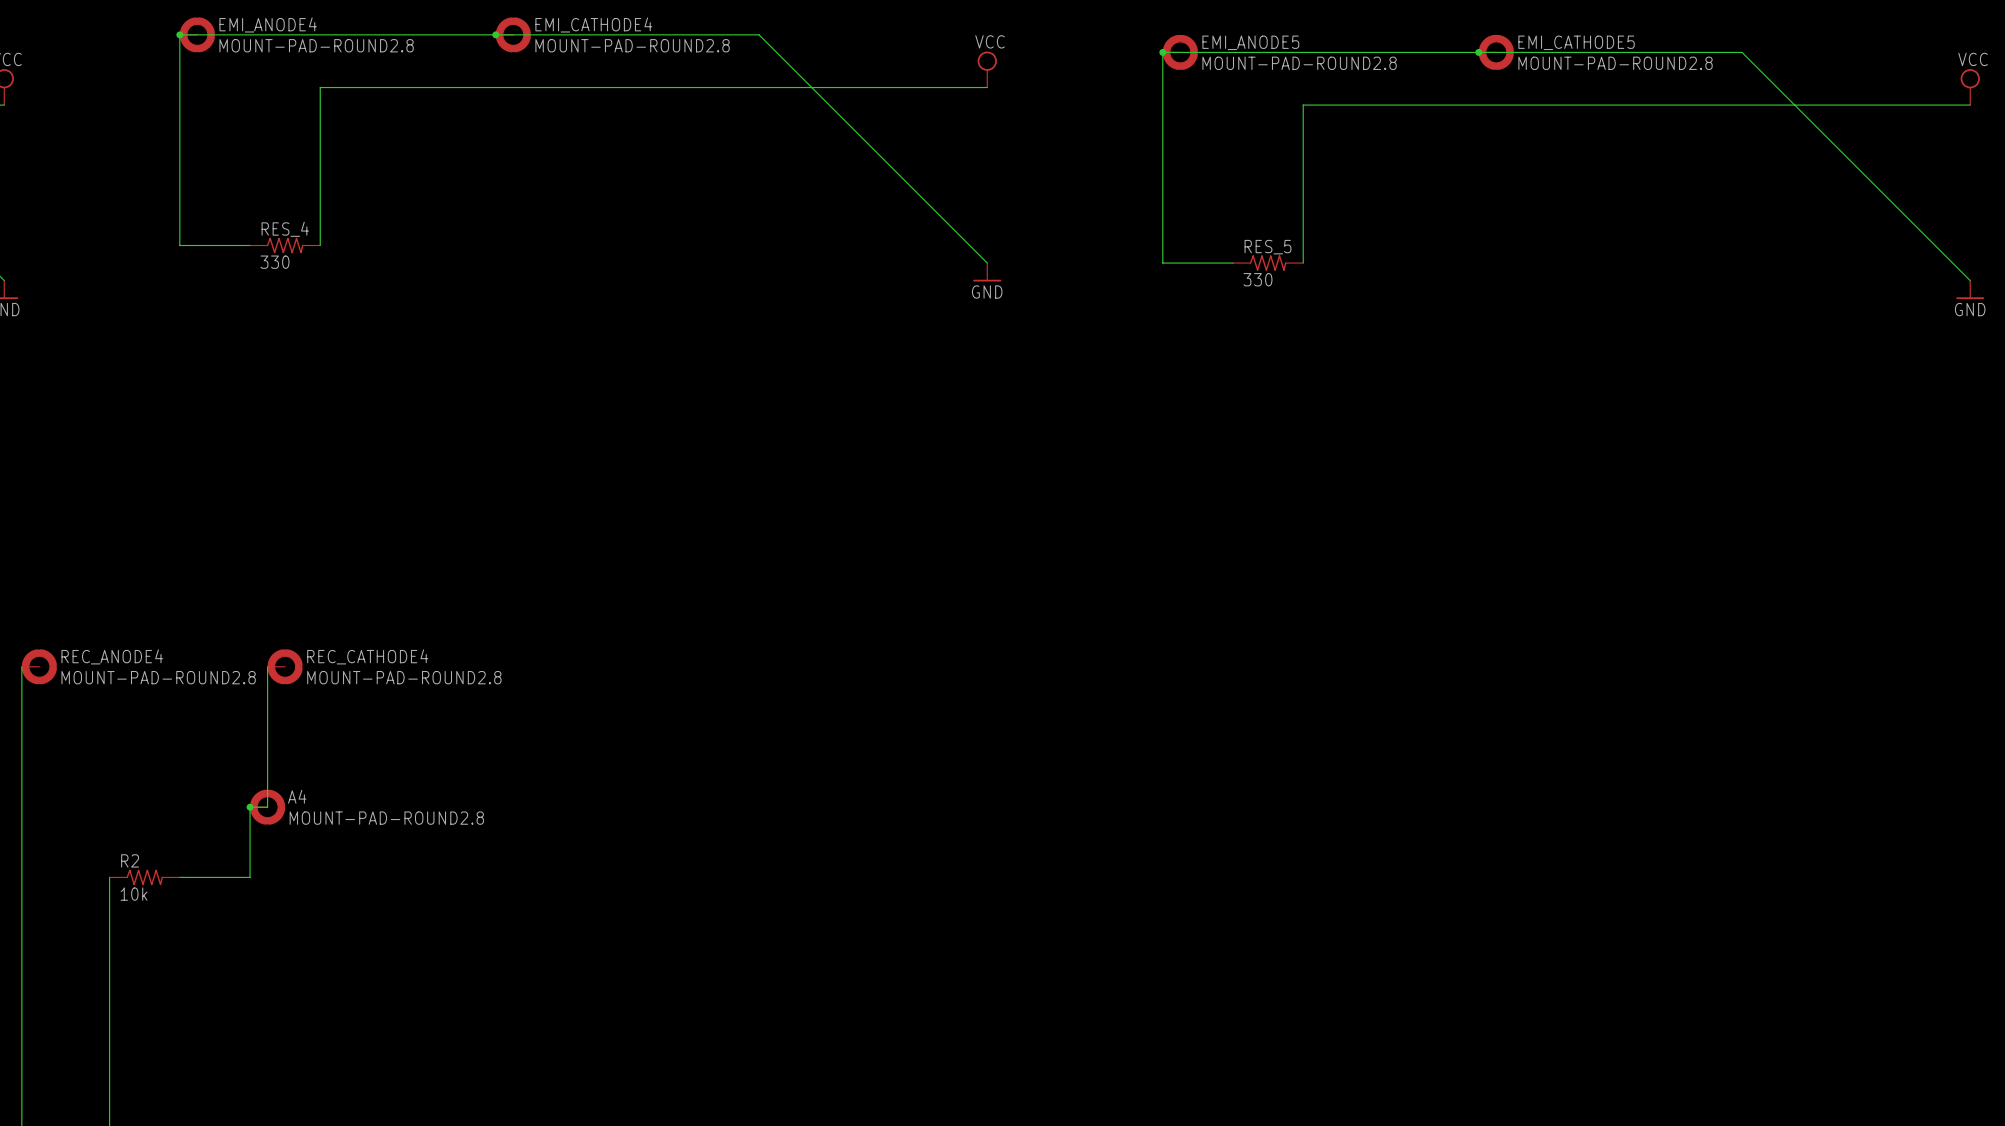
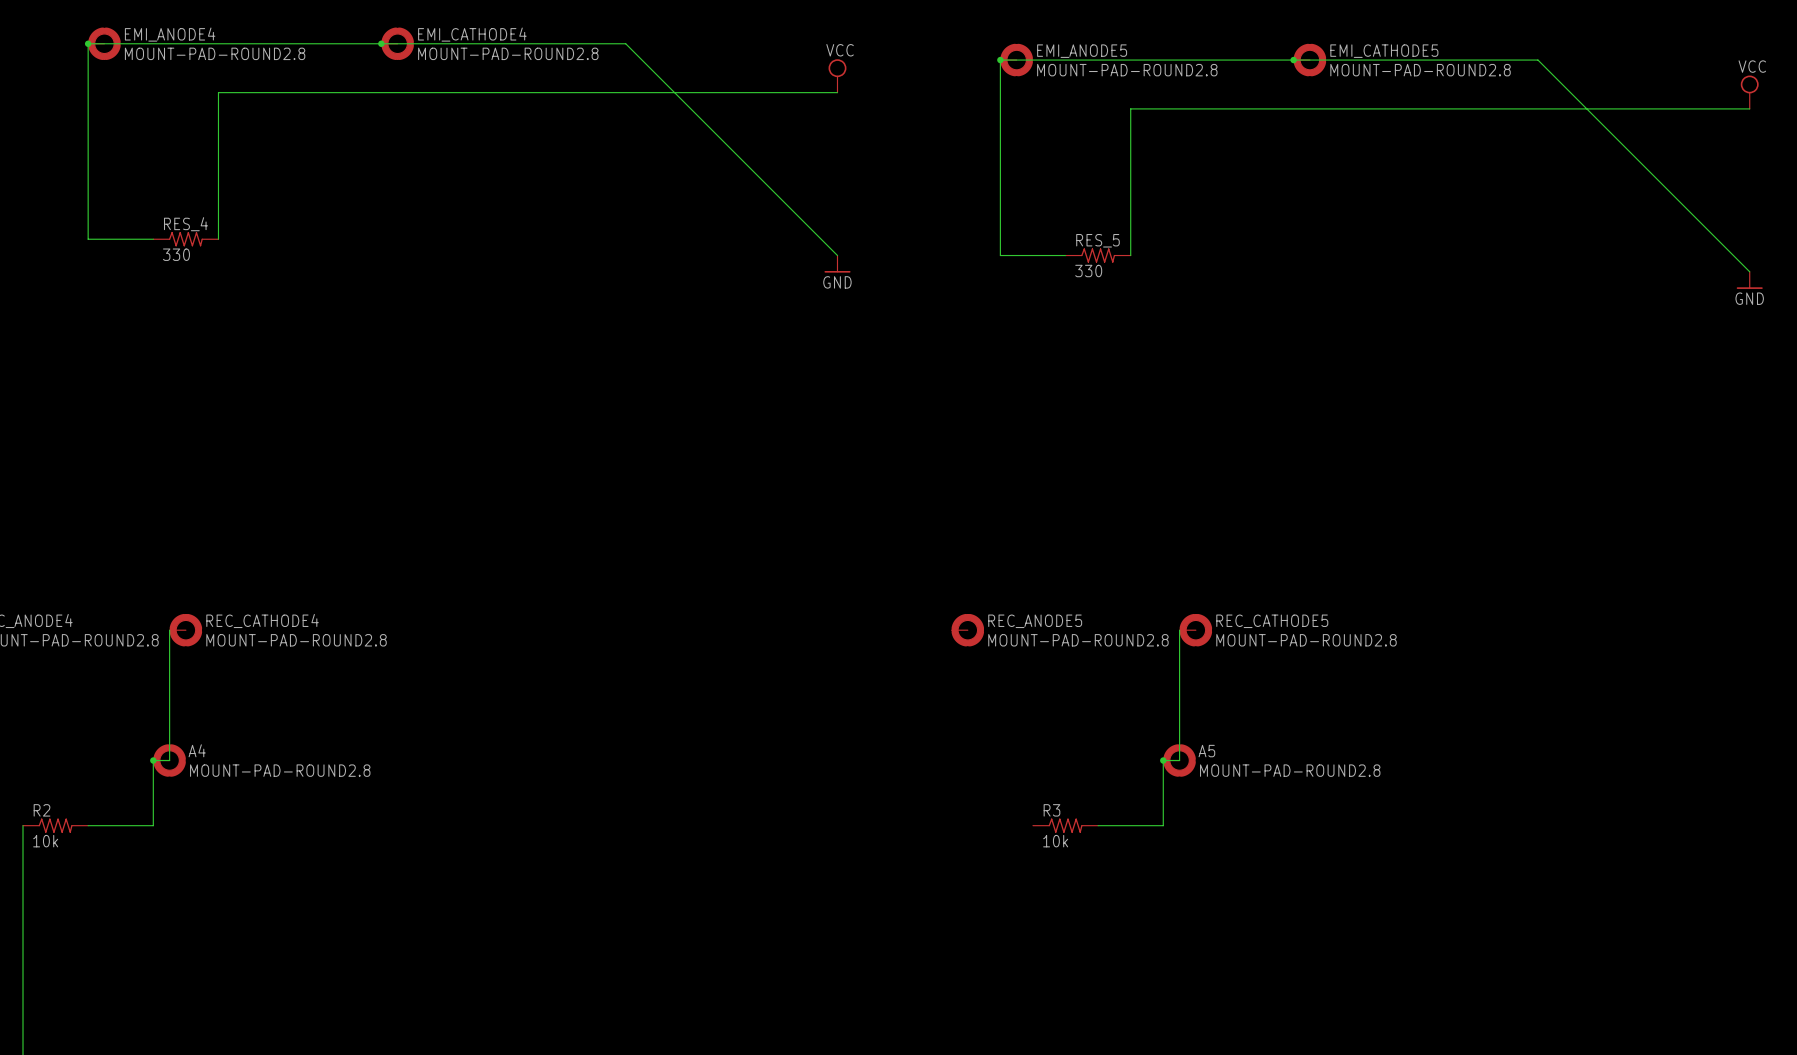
REC_ANODE5: none -> MOUNT-PAD-ROUND2.8 (967, 630)
wire: none -> (1179, 630) (1179, 760) (1163, 760) (1163, 825) (1098, 825)
REC_CATHODE5: none -> MOUNT-PAD-ROUND2.8 (1195, 630)
junction: none -> (1163, 760)
A5: none -> MOUNT-PAD-ROUND2.8 (1179, 760)
R3: none -> 10k (1065, 825)

